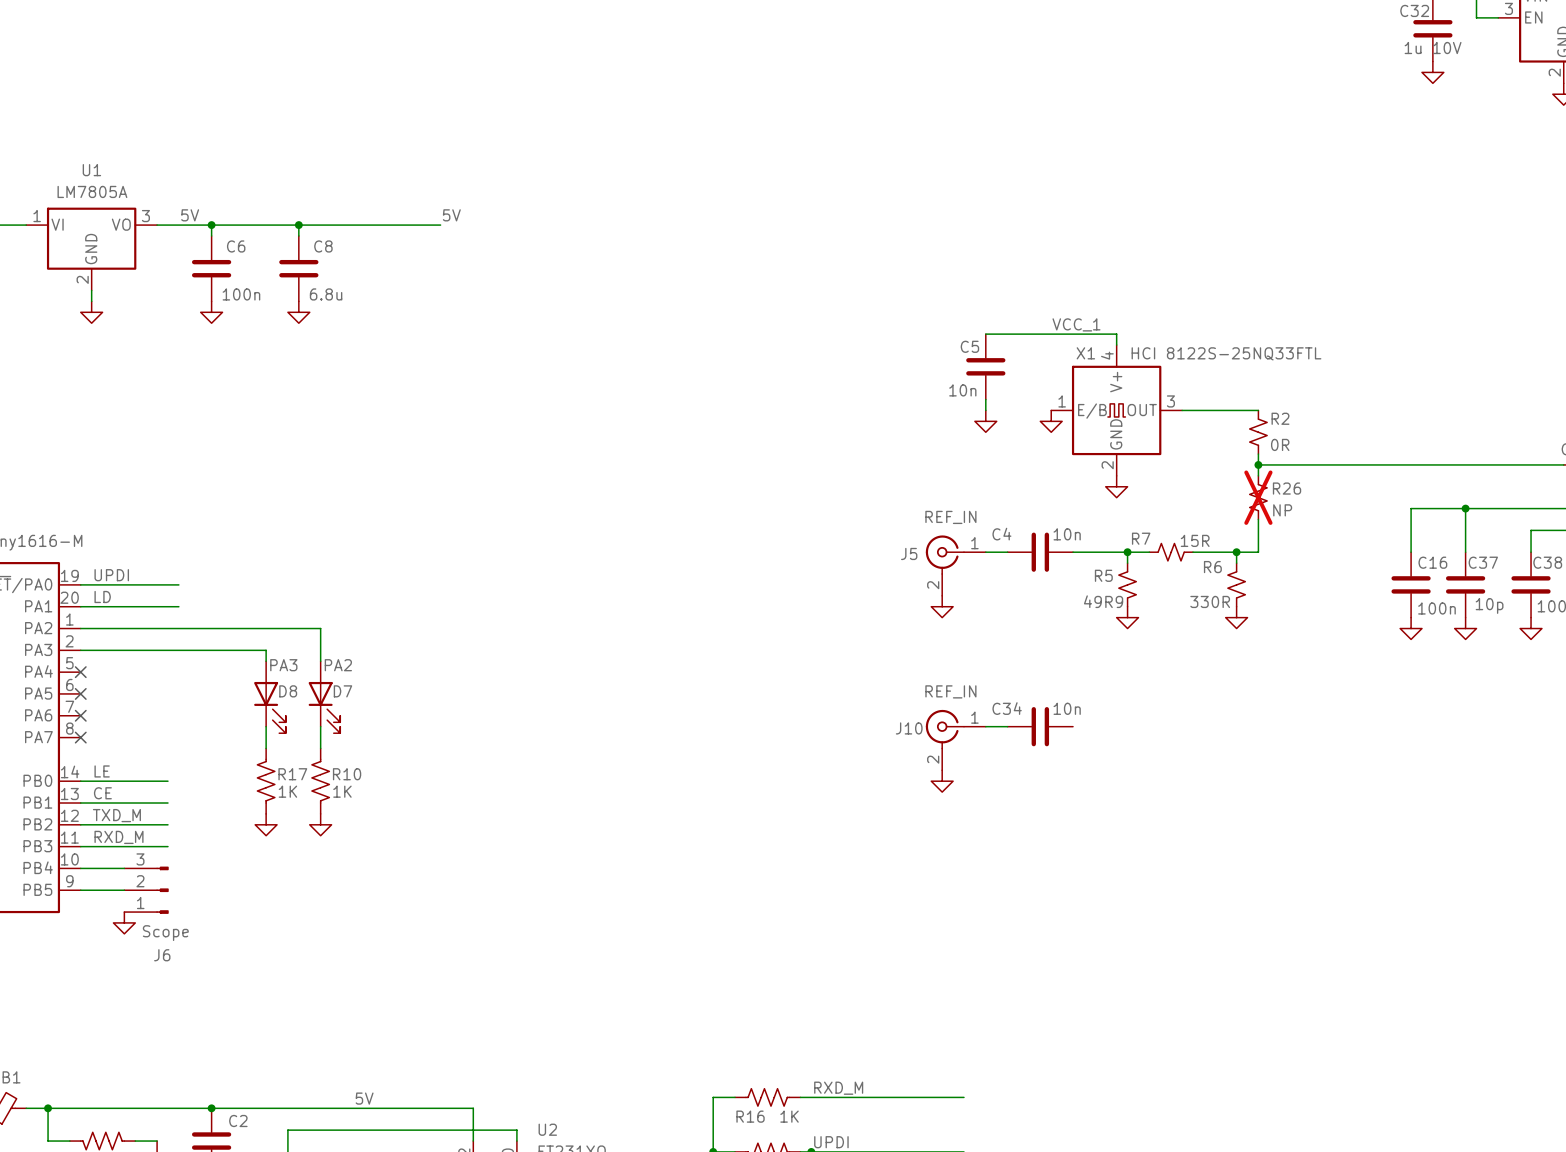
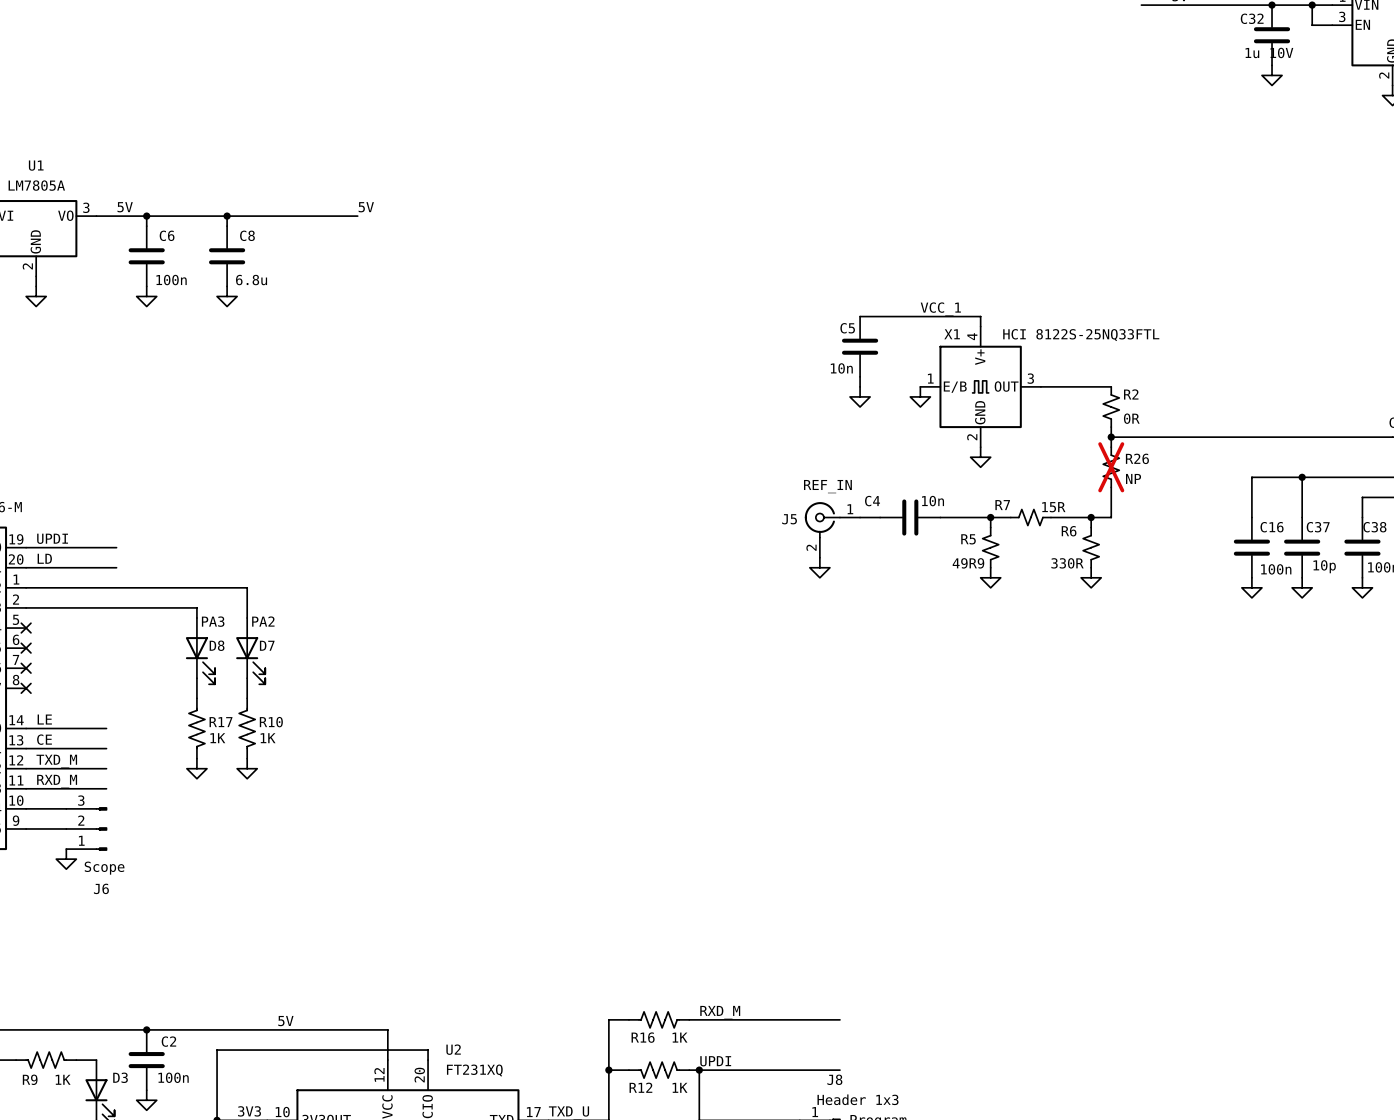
wire: (985, 726) (1007, 726) -> none
C34: 10n (1040, 726) -> none
J10: REF_IN (955, 740) -> none
power symbol: (942, 781) -> none

